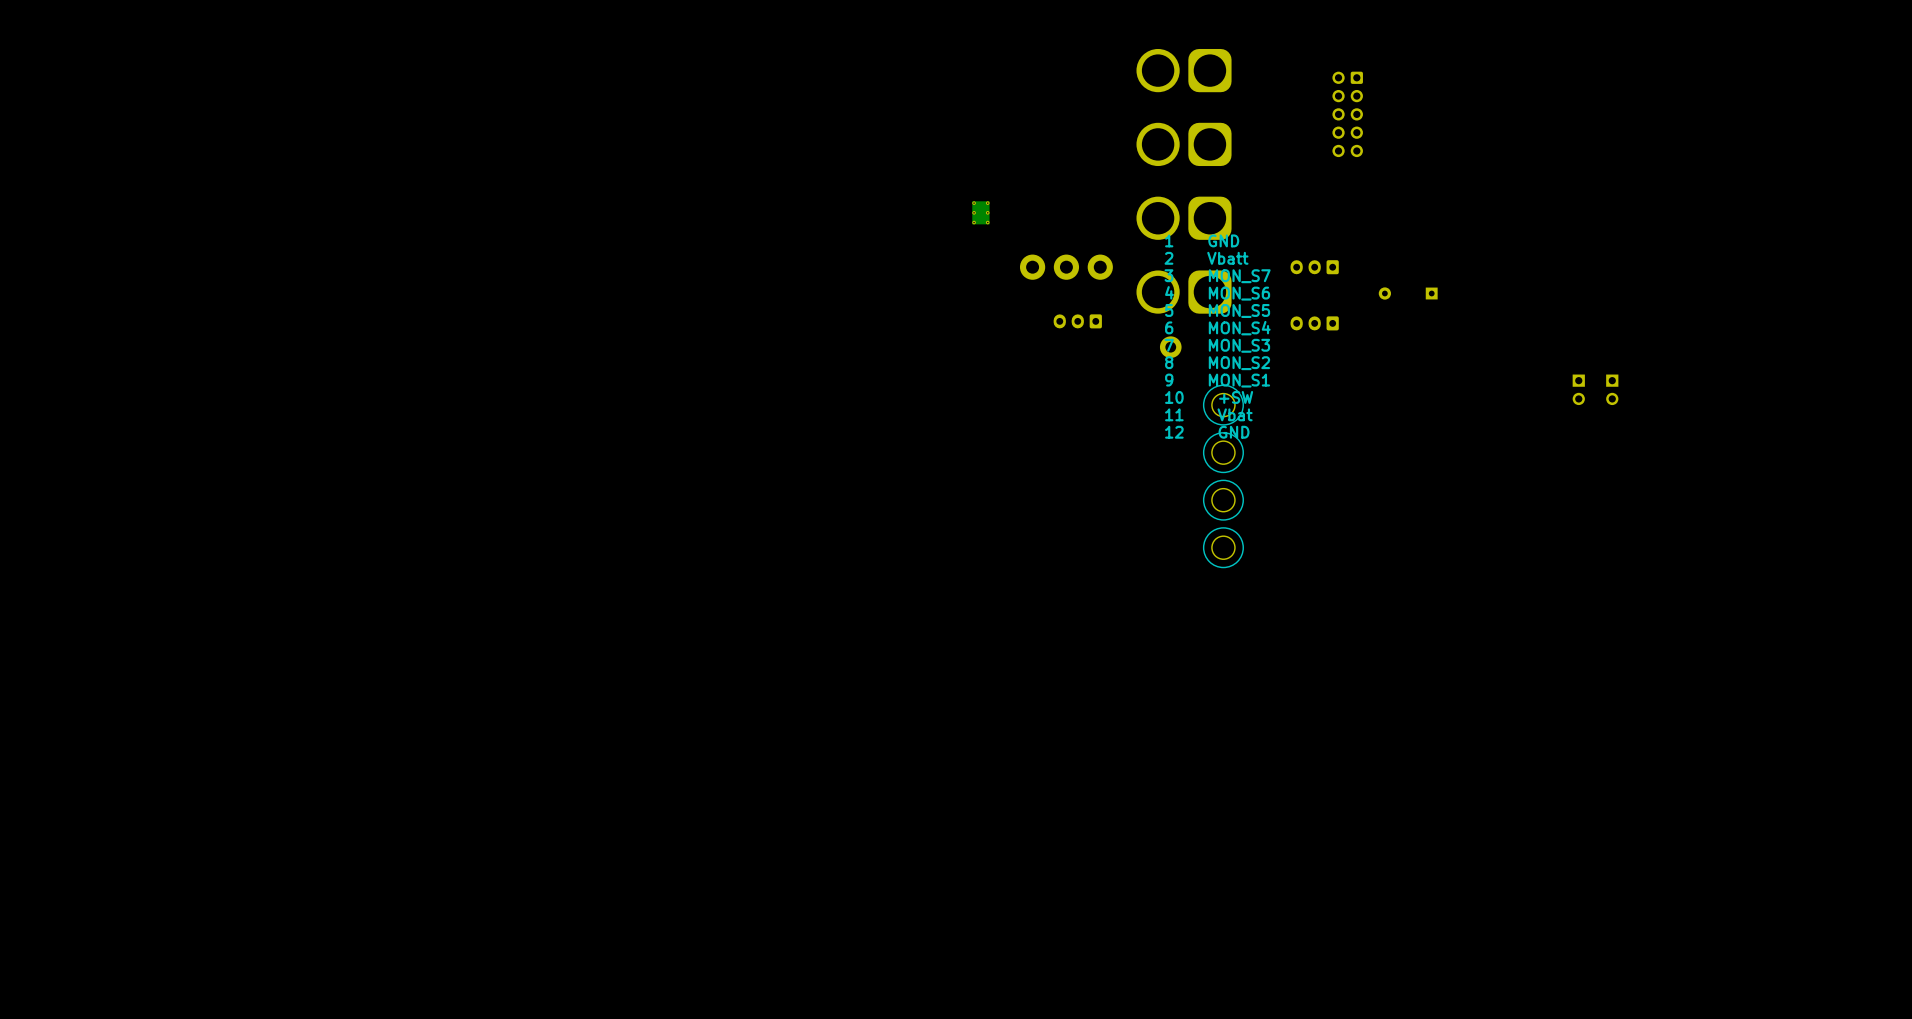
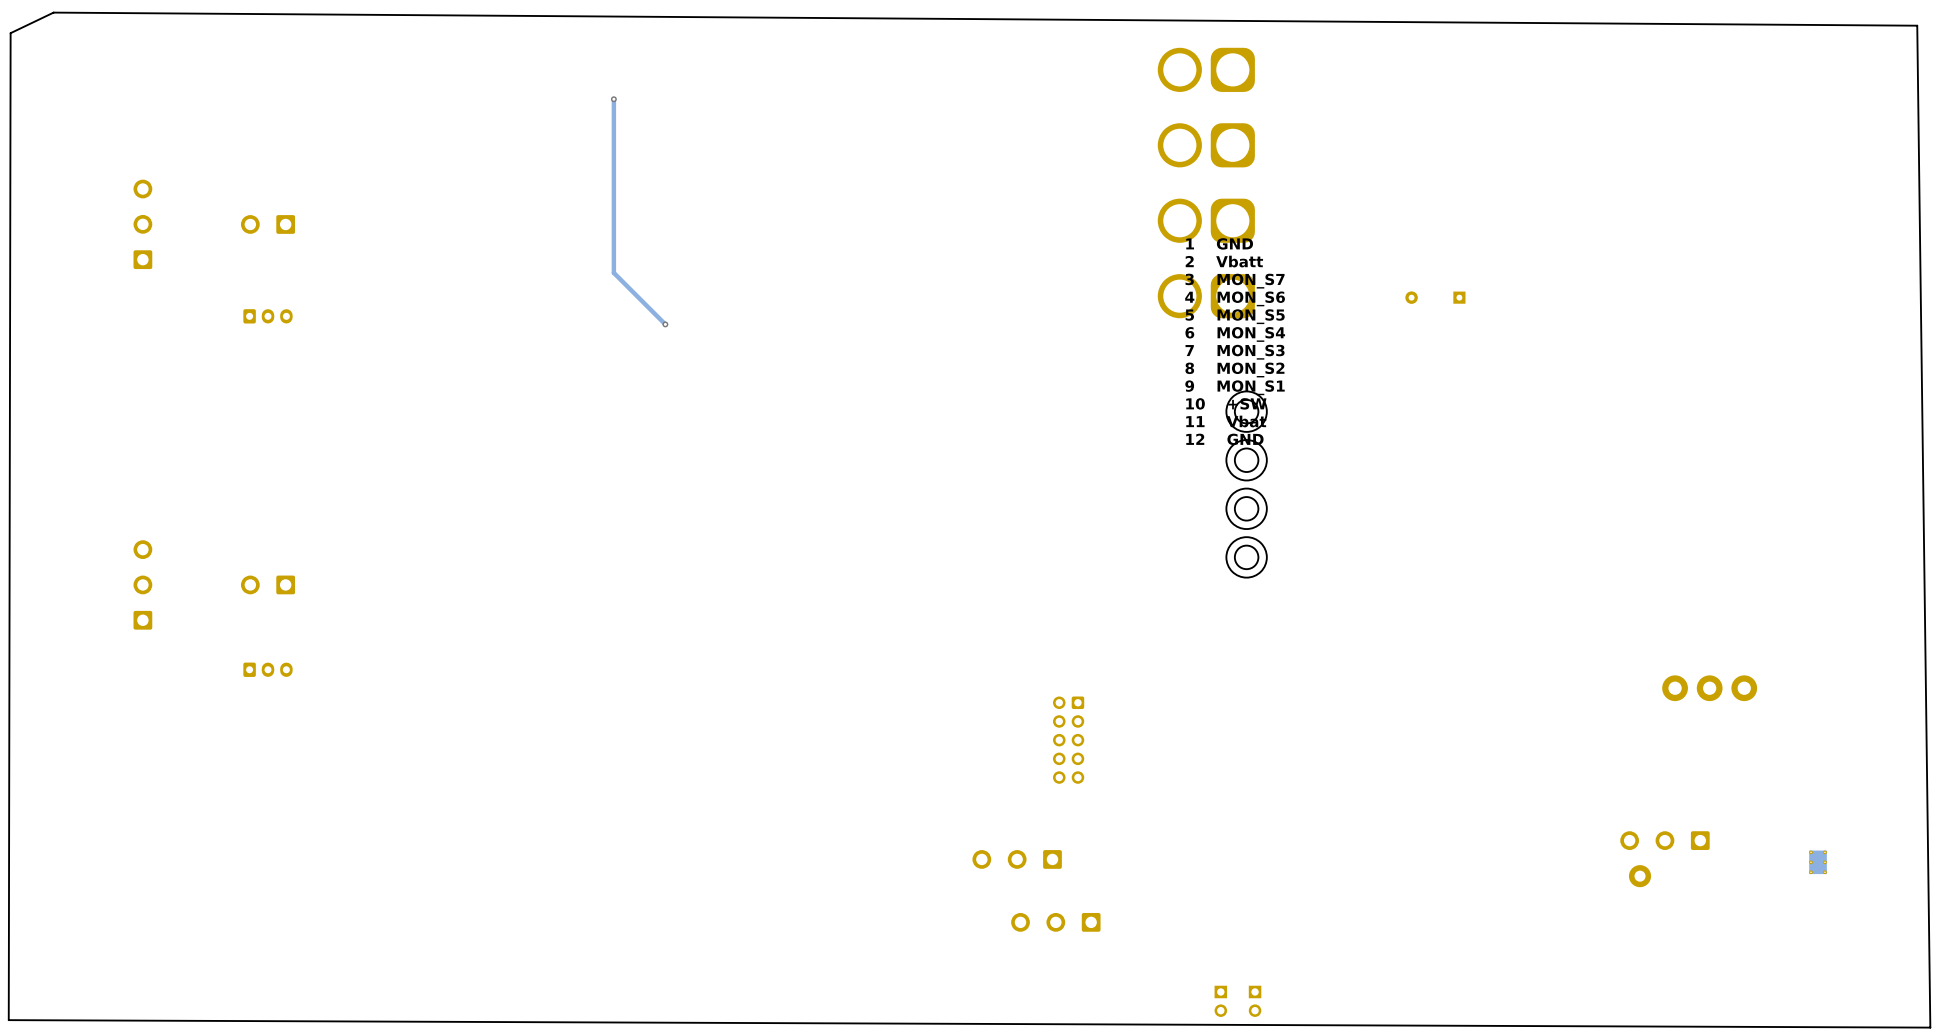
board edge: none -> (53, 12) (1917, 25) (1930, 1027) (8, 1020) (10, 33) (53, 12)
track: none -> (613, 99) (613, 272) (665, 324)
via: none -> (613, 99)
part: (1347, 114) -> none
part: (980, 212) -> none
part: none -> (142, 224)
part: none -> (268, 224)
part: (1066, 267) -> none
part: (1314, 267) -> none
part: none -> (267, 316)
via: none -> (665, 324)
part: (1077, 321) -> none
part: (1314, 323) -> none
part: (1170, 347) -> none
part: (1578, 389) -> none
part: (1612, 389) -> none
part: none -> (142, 584)
part: none -> (268, 584)
part: none -> (267, 669)
part: none -> (1709, 688)
part: none -> (1068, 740)
part: none -> (1664, 840)
part: none -> (1017, 859)
part: none -> (1818, 862)
part: none -> (1640, 876)
part: none -> (1055, 922)
part: none -> (1220, 1001)
part: none -> (1255, 1001)

